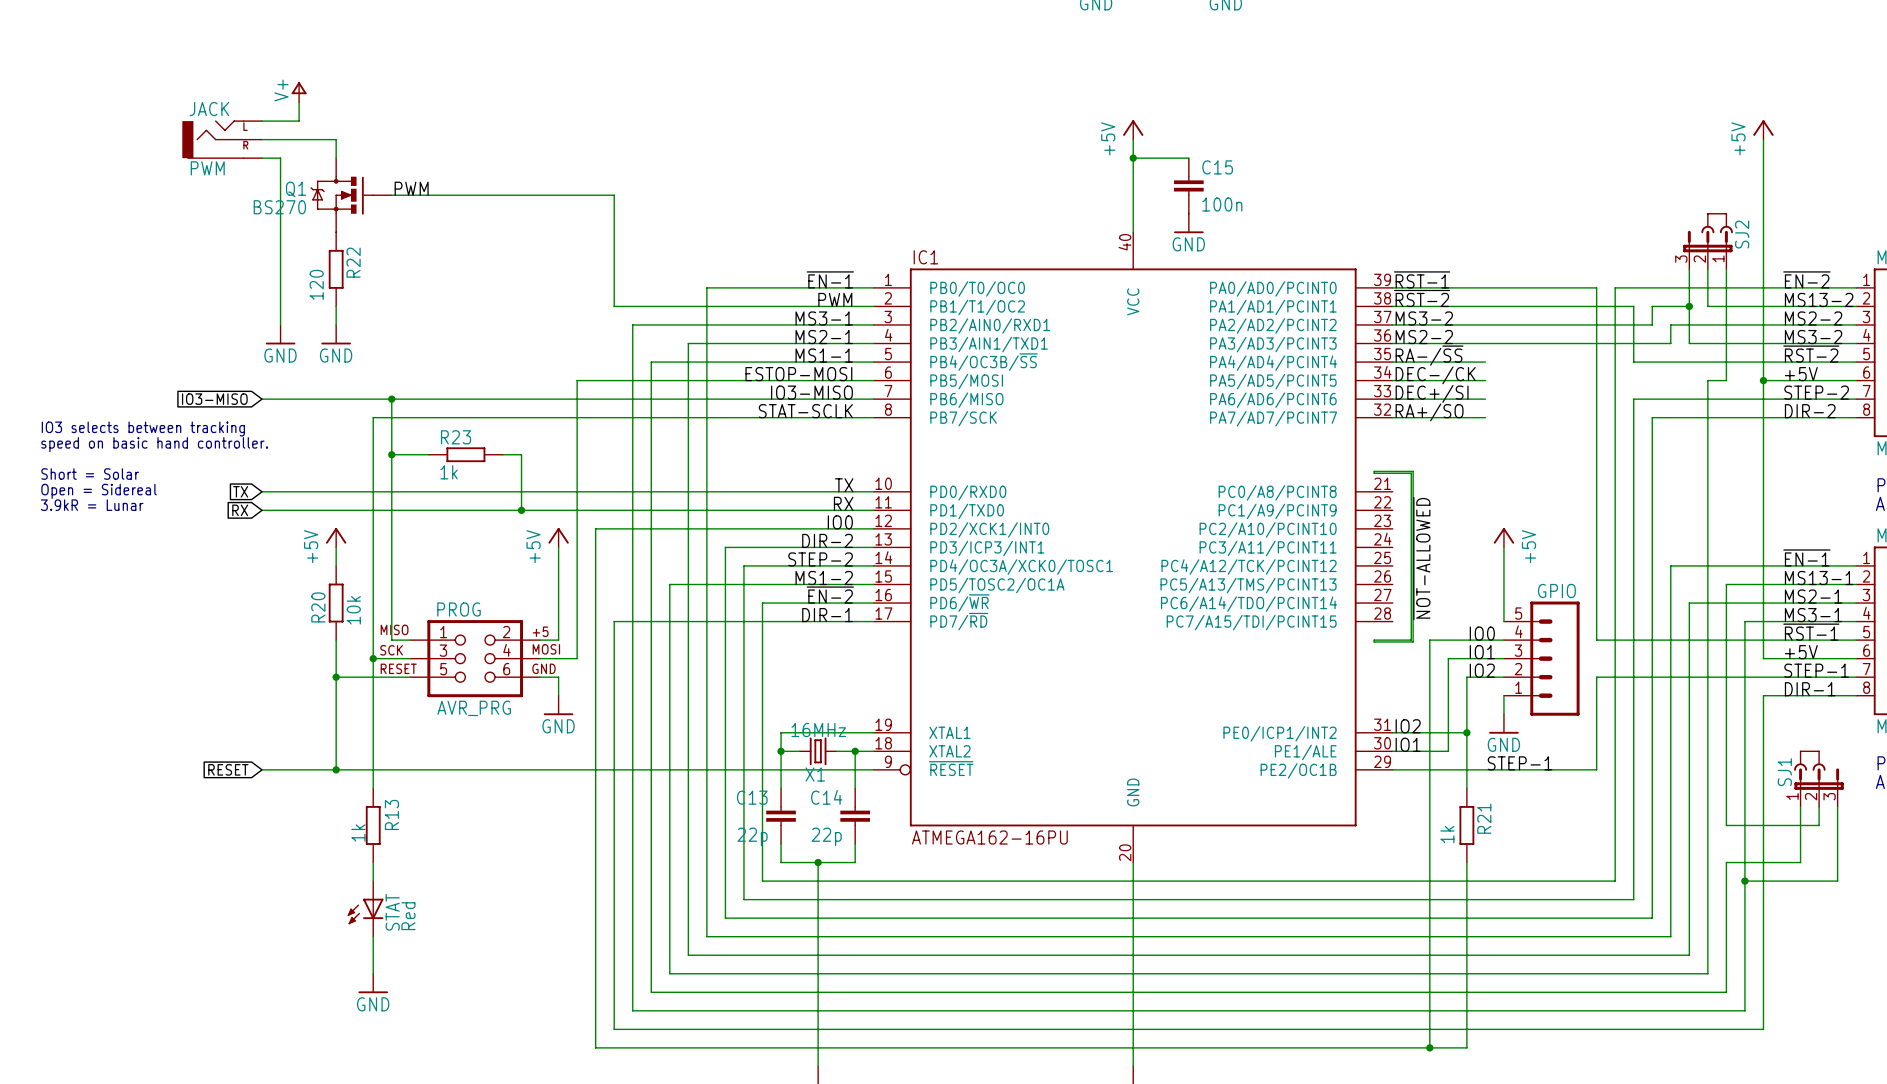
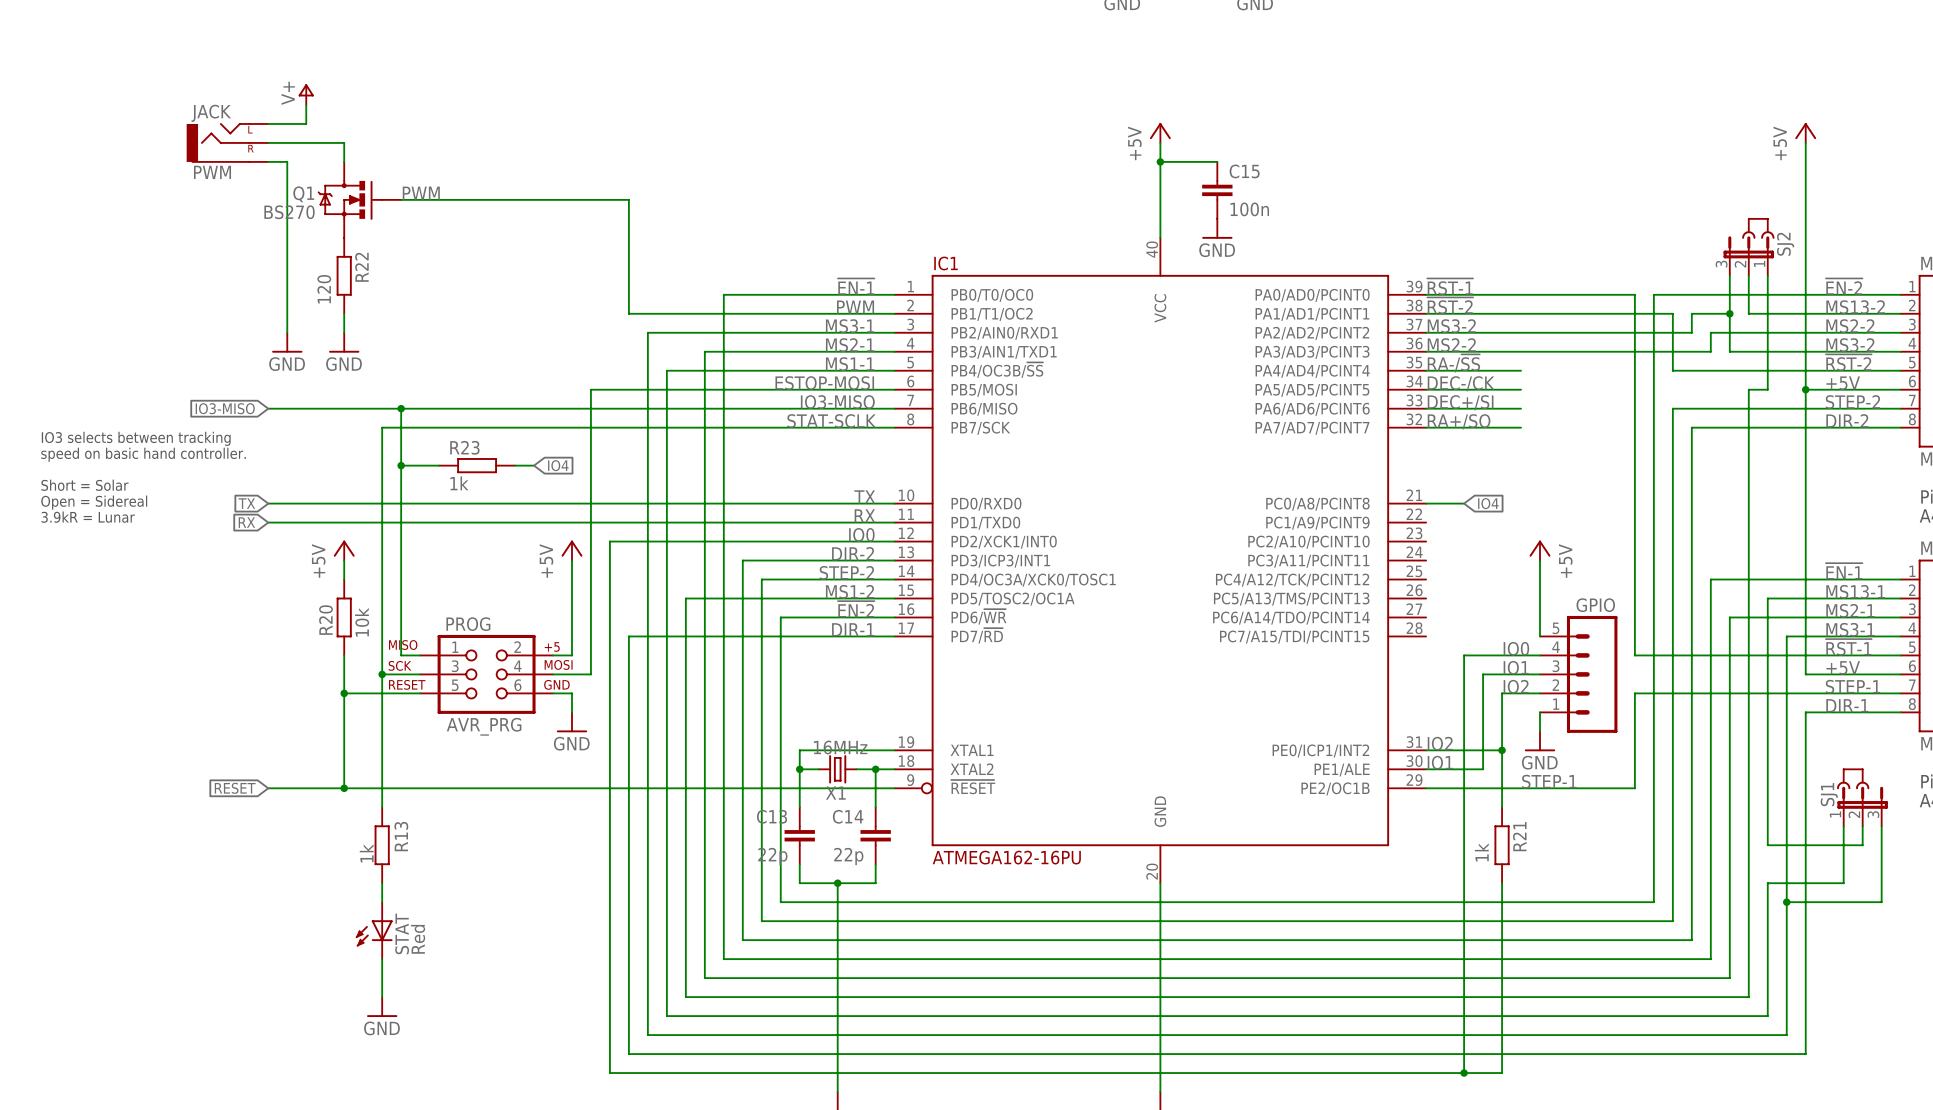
wire: (521, 454) (521, 510) -> none
global label: none -> IO4 (558, 465)
wire: (1374, 471) (1374, 473) (1411, 473) (1411, 640) (1374, 640) (1374, 641) (1413, 641) (1413, 471) (1374, 471) -> none
wire: none -> (1426, 503) (1464, 503)
global label: none -> IO4 (1488, 503)
junction: (521, 510) -> none
label: ~{NOT-ALLOWED} (1421, 558) -> none

